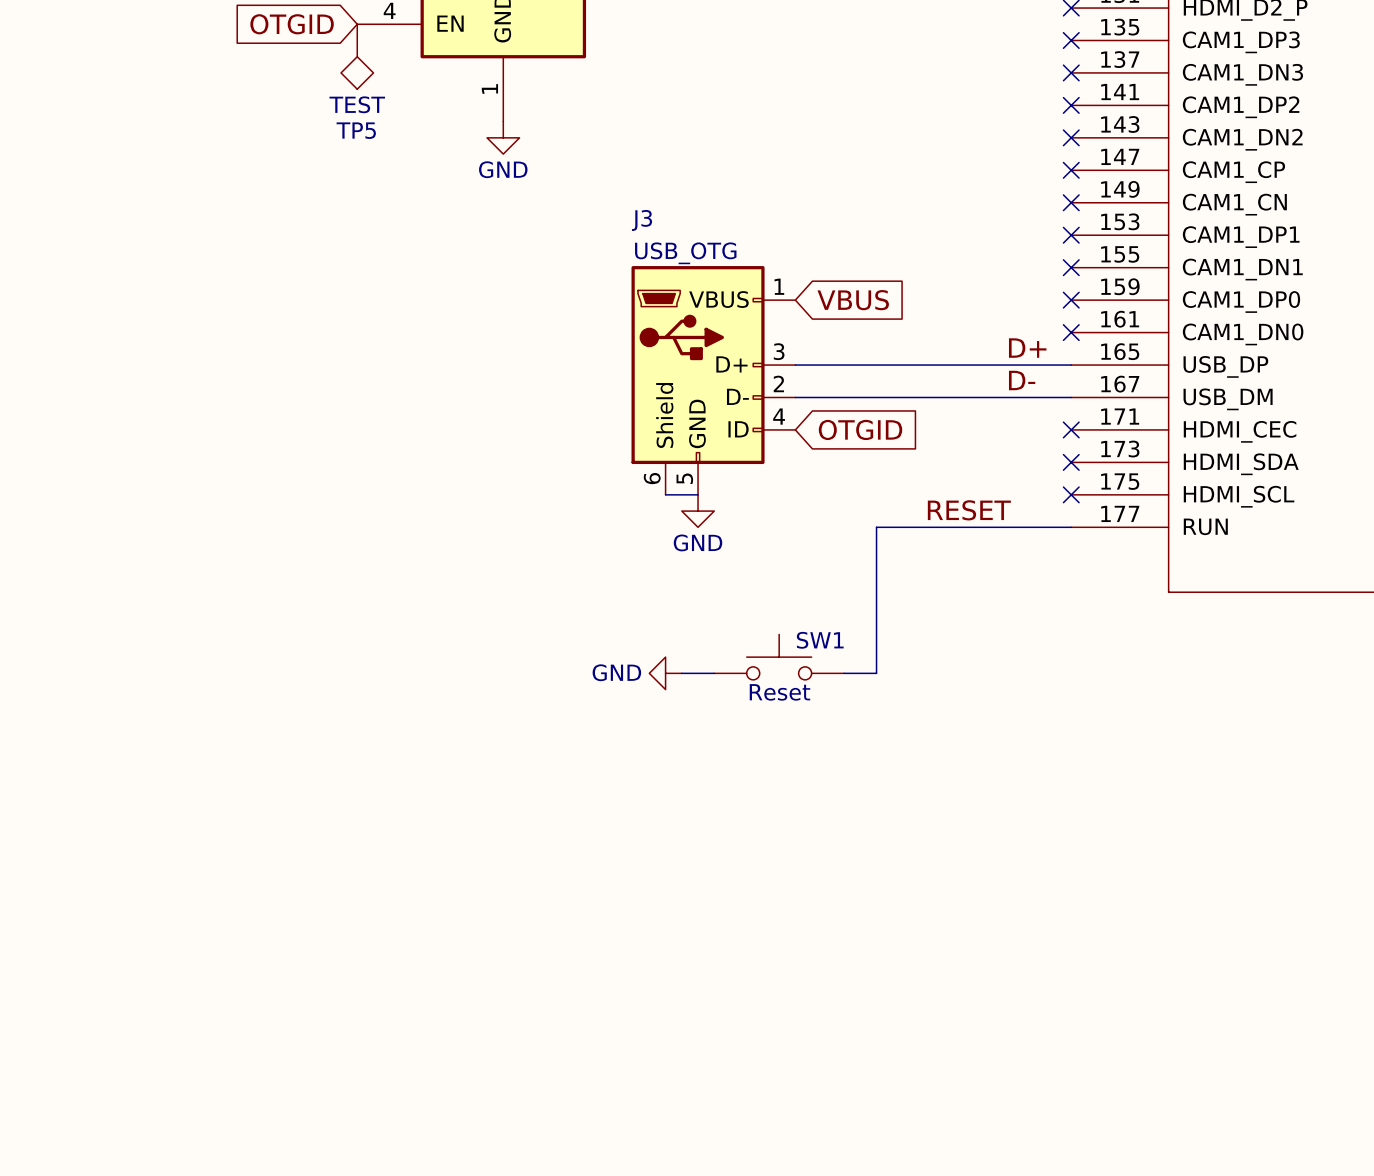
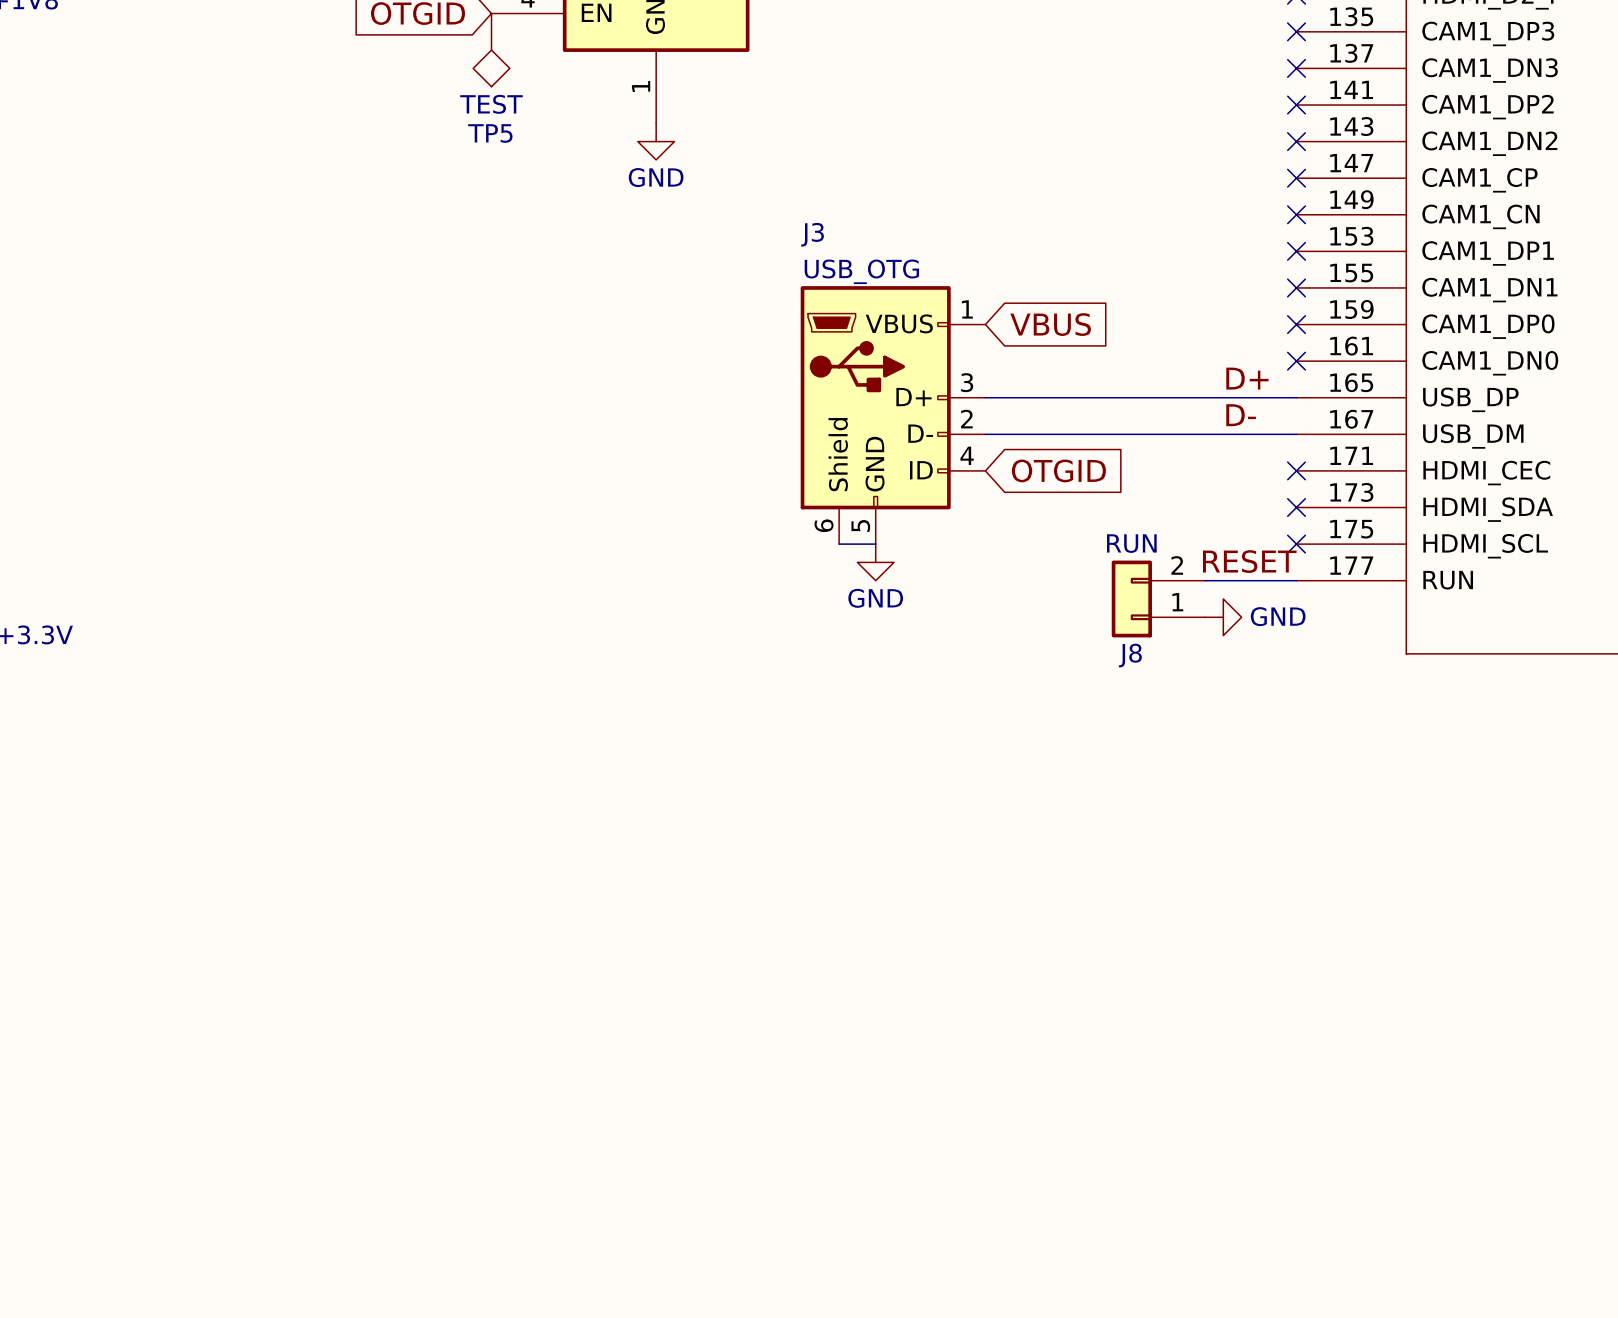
label position: RESET (969, 510) -> RESET (1249, 561)
wire: (990, 527) (876, 527) (876, 673) (844, 673) -> none
J8: none -> RUN (1158, 598)
power symbol: none -> GND (1223, 617)
SW1: Reset (779, 657) -> none
power symbol: GND (665, 673) -> none
wire: (681, 673) (714, 673) -> none

